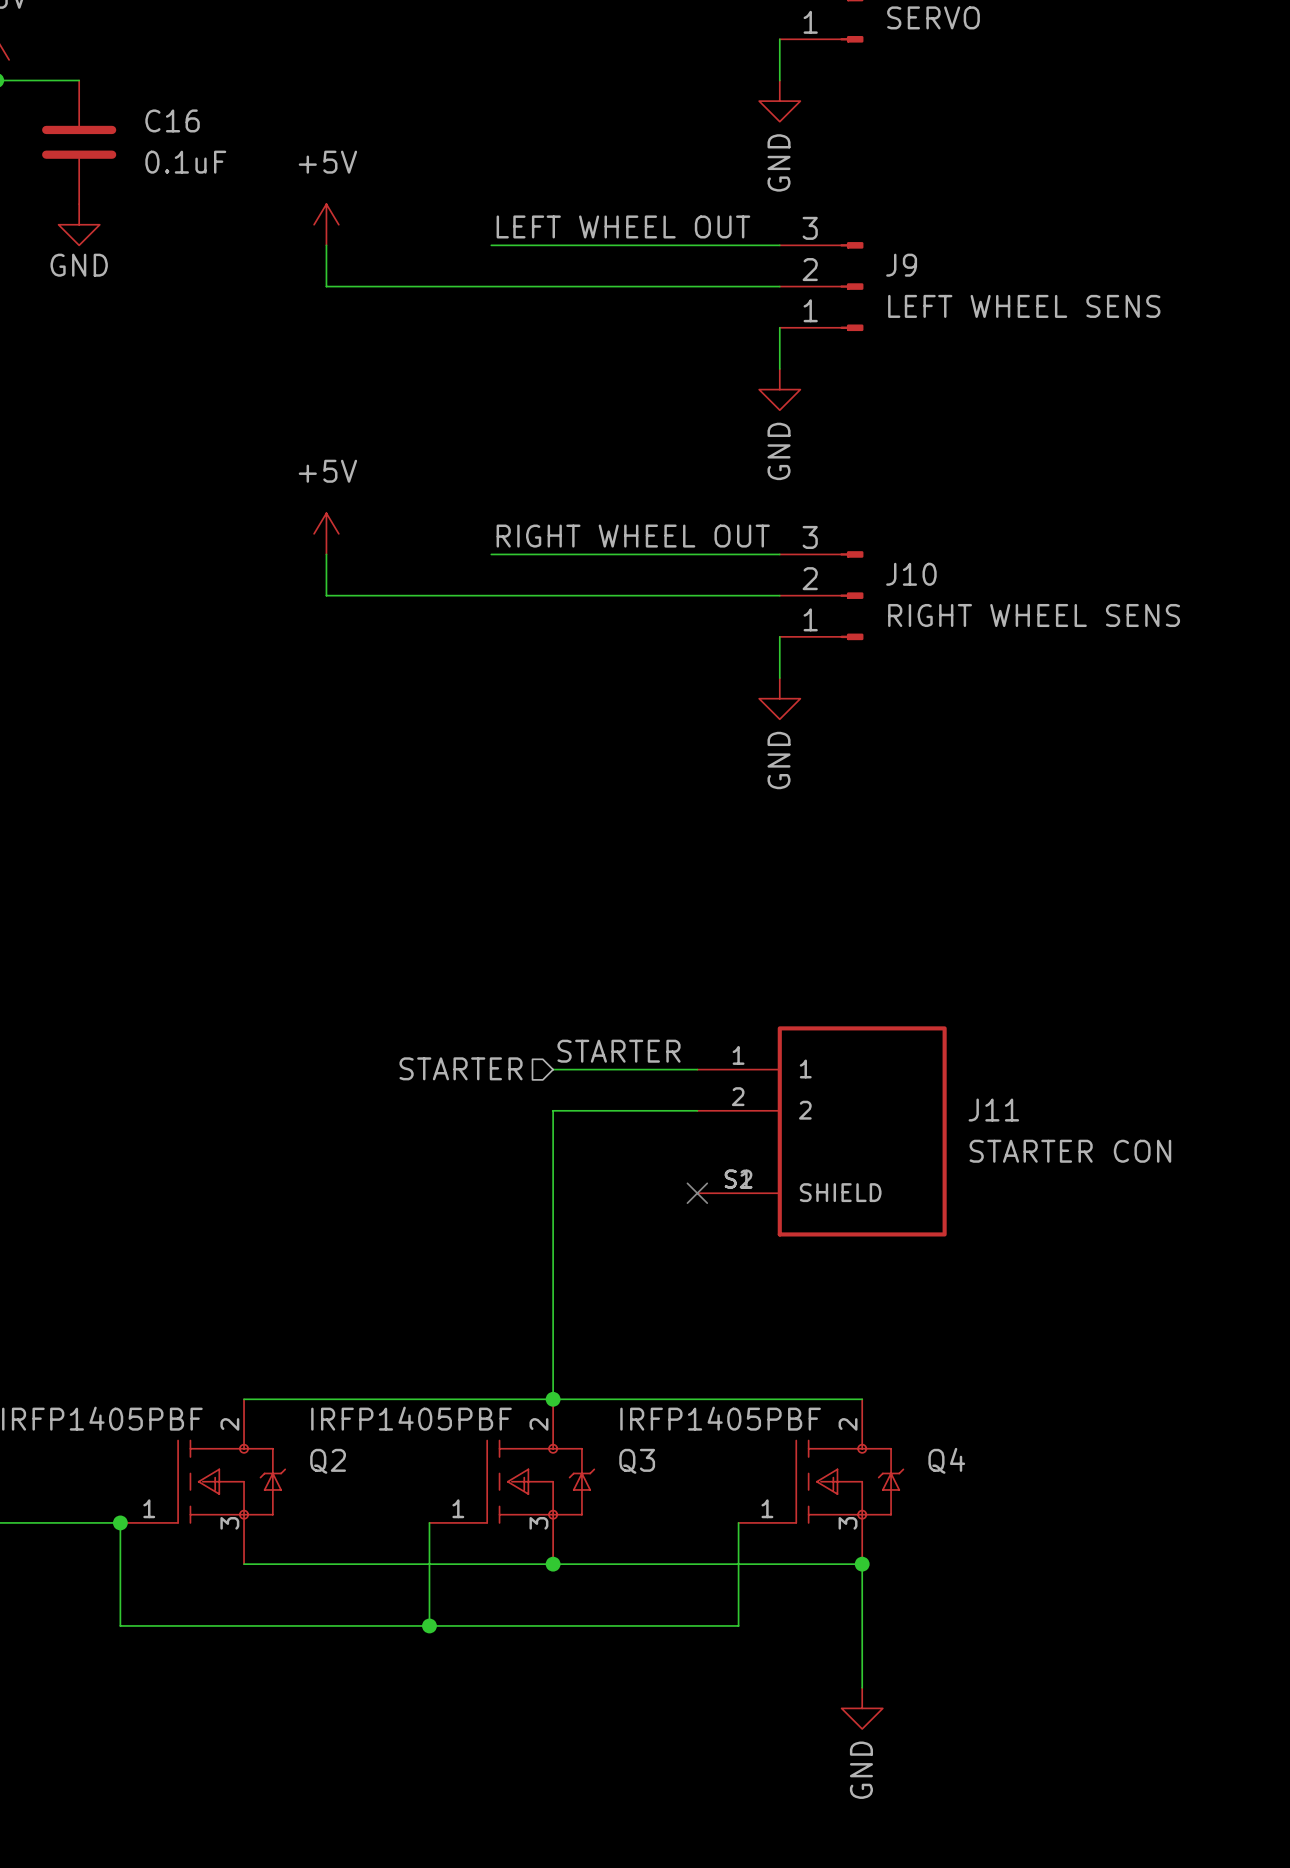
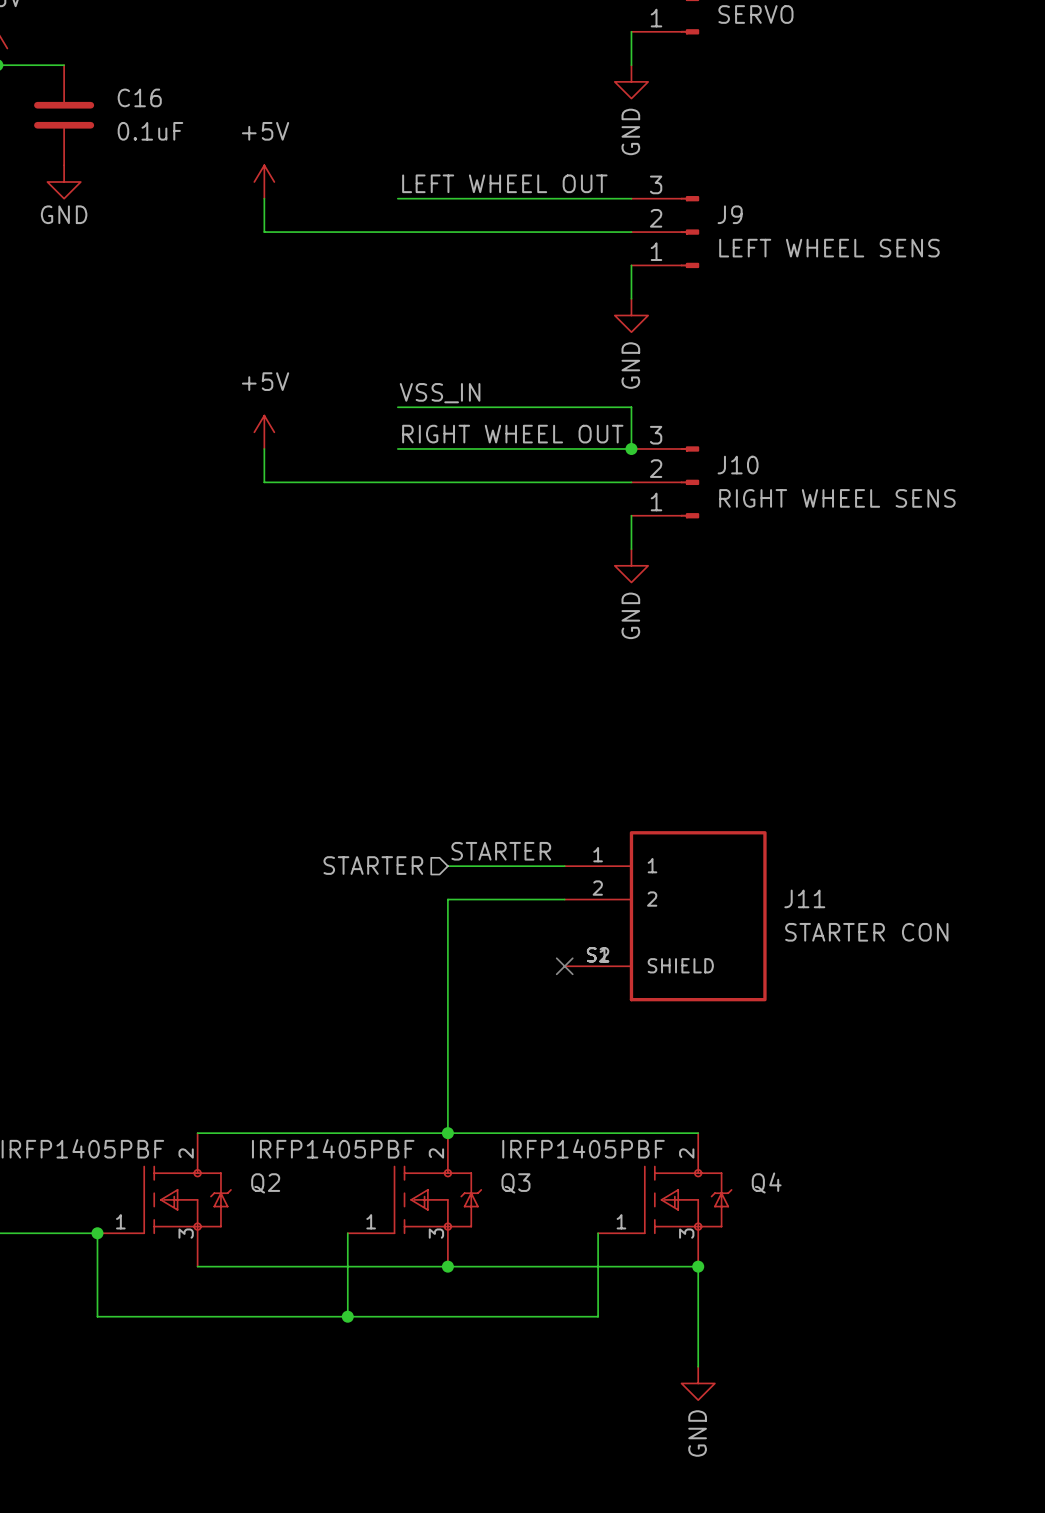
label: none -> VSS_IN (440, 393)
wire: none -> (397, 407) (631, 407) (631, 448)
junction: none -> (631, 448)

